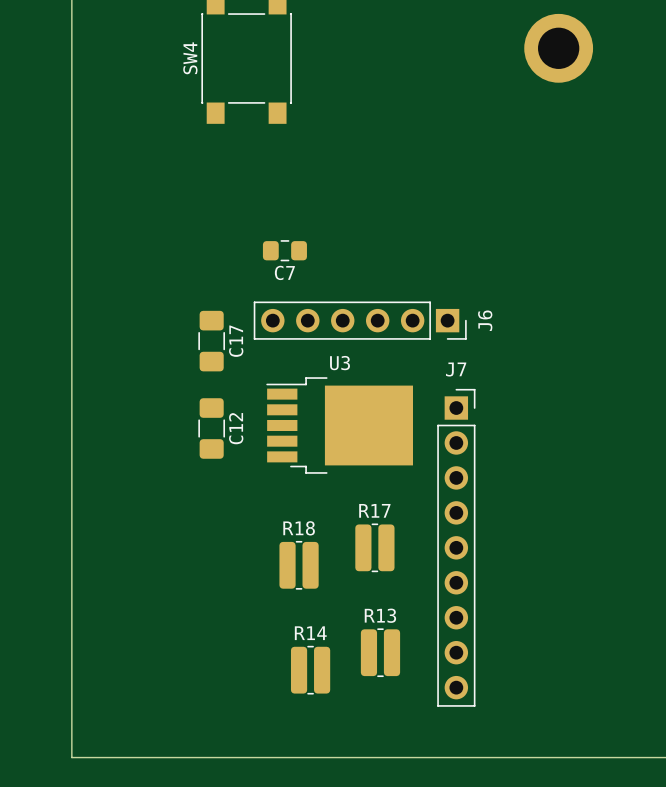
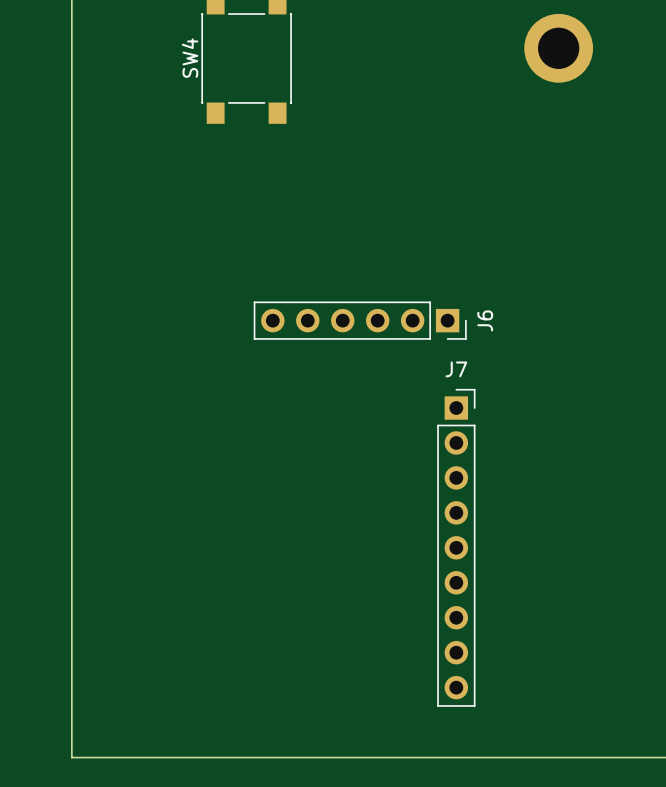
C7: (284, 250) -> none
C17: (211, 341) -> none
U3: (339, 425) -> none
C12: (211, 428) -> none
R17: (374, 547) -> none
R18: (299, 565) -> none
R13: (380, 652) -> none
R14: (310, 670) -> none

